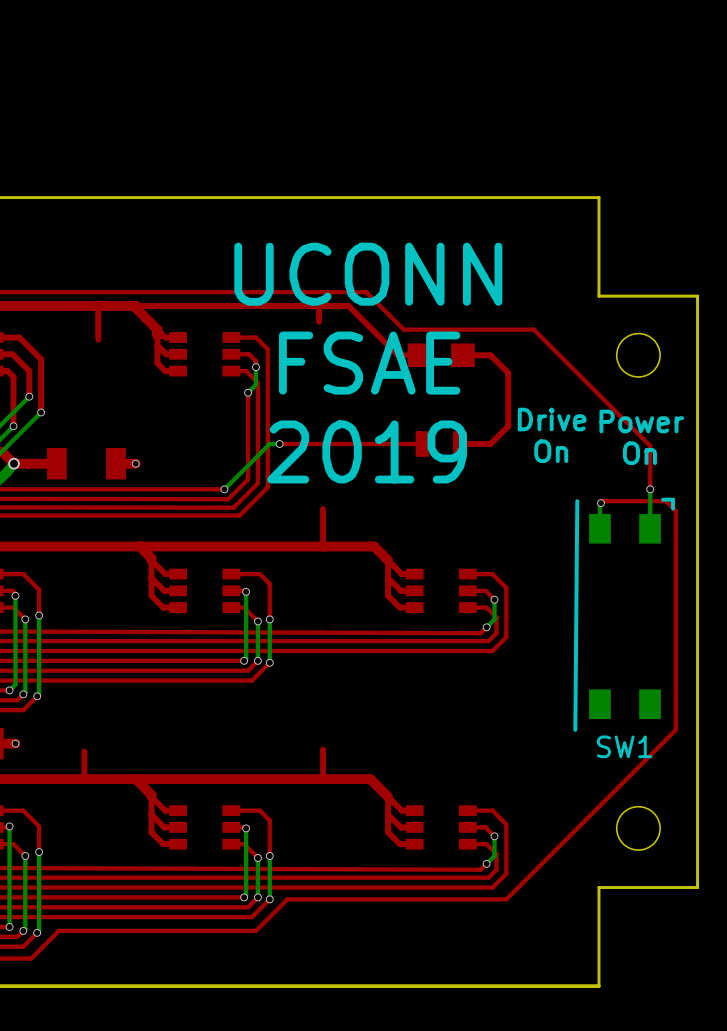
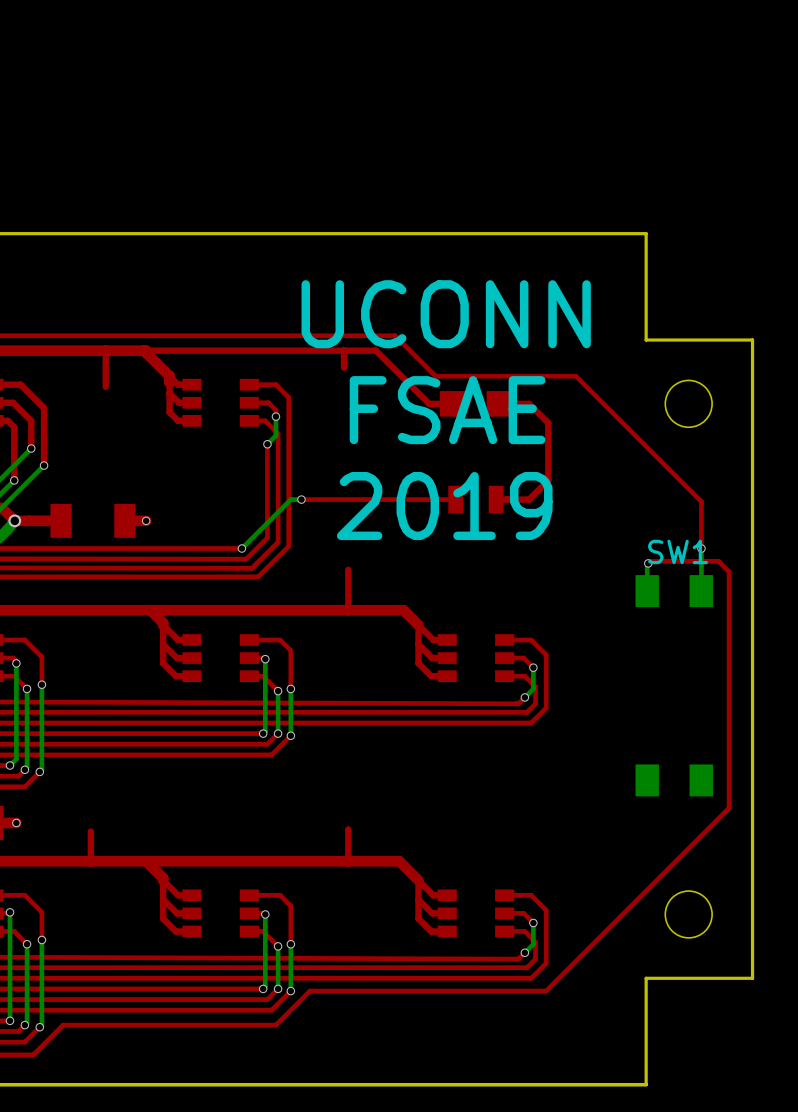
text position: UCONN (368, 274) -> UCONN (446, 314)
text position: FSAE (369, 363) -> FSAE (447, 410)
text: Drive (552, 419) -> none
text: Power (641, 421) -> none
text position: 2019 (367, 451) -> 2019 (444, 506)
text: On (551, 451) -> none
text: On (639, 453) -> none
line: (663, 499) (672, 499) (672, 508) -> none
line: (577, 501) (575, 729) -> none
SW1 name position: SW1 (624, 746) -> SW1 (678, 551)

